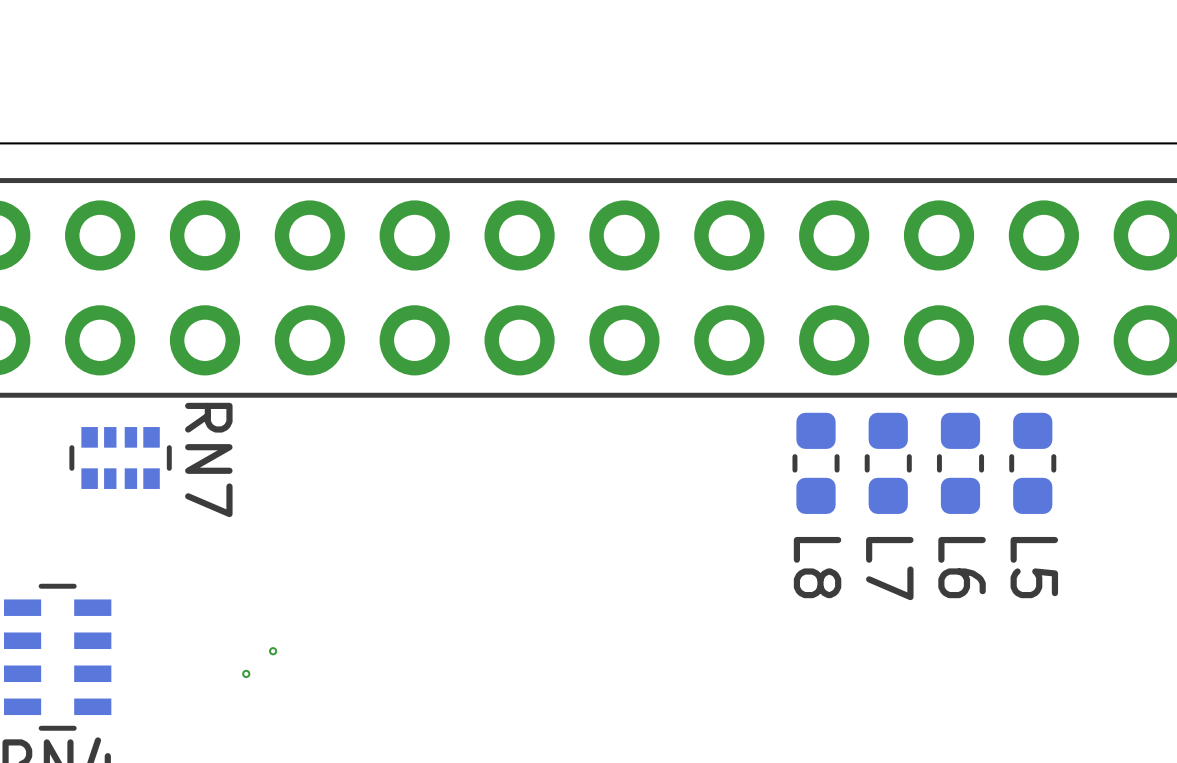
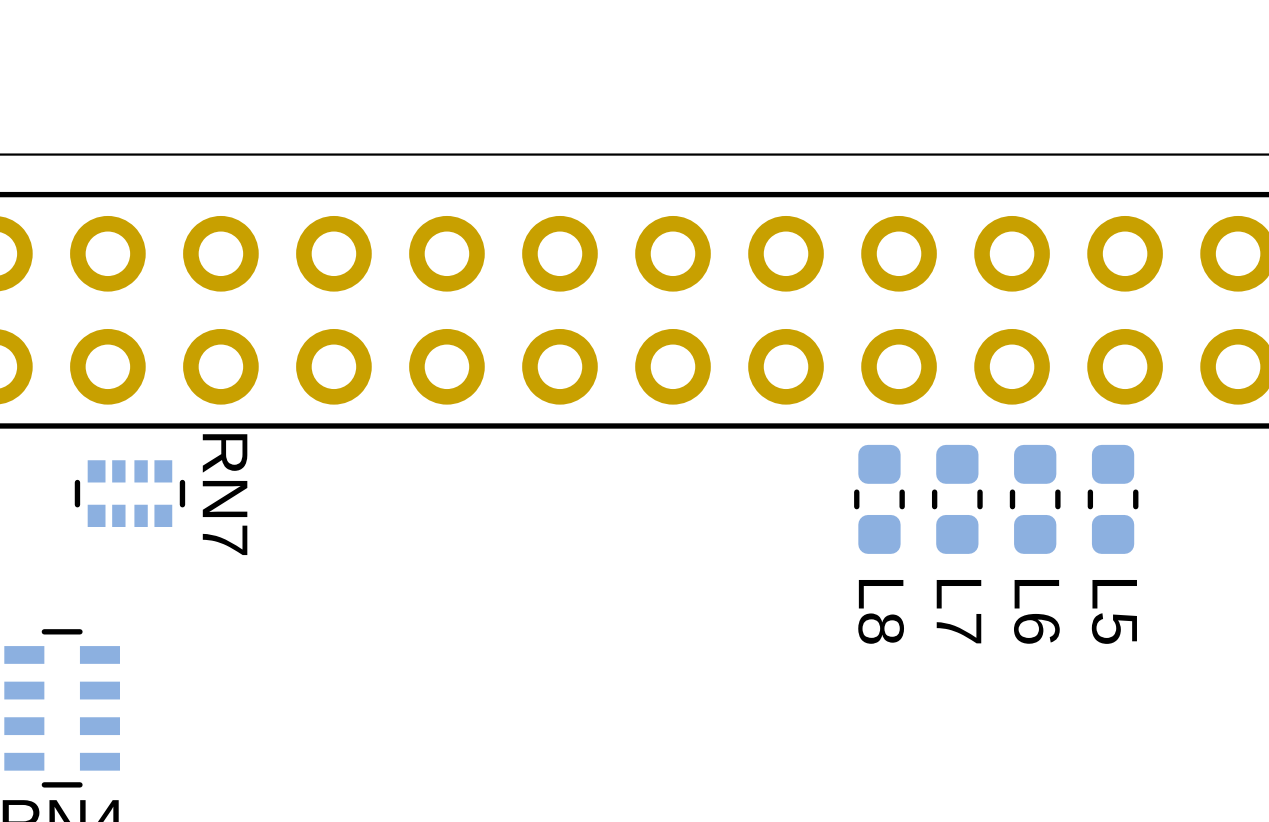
via: (273, 651) -> none
via: (246, 673) -> none

